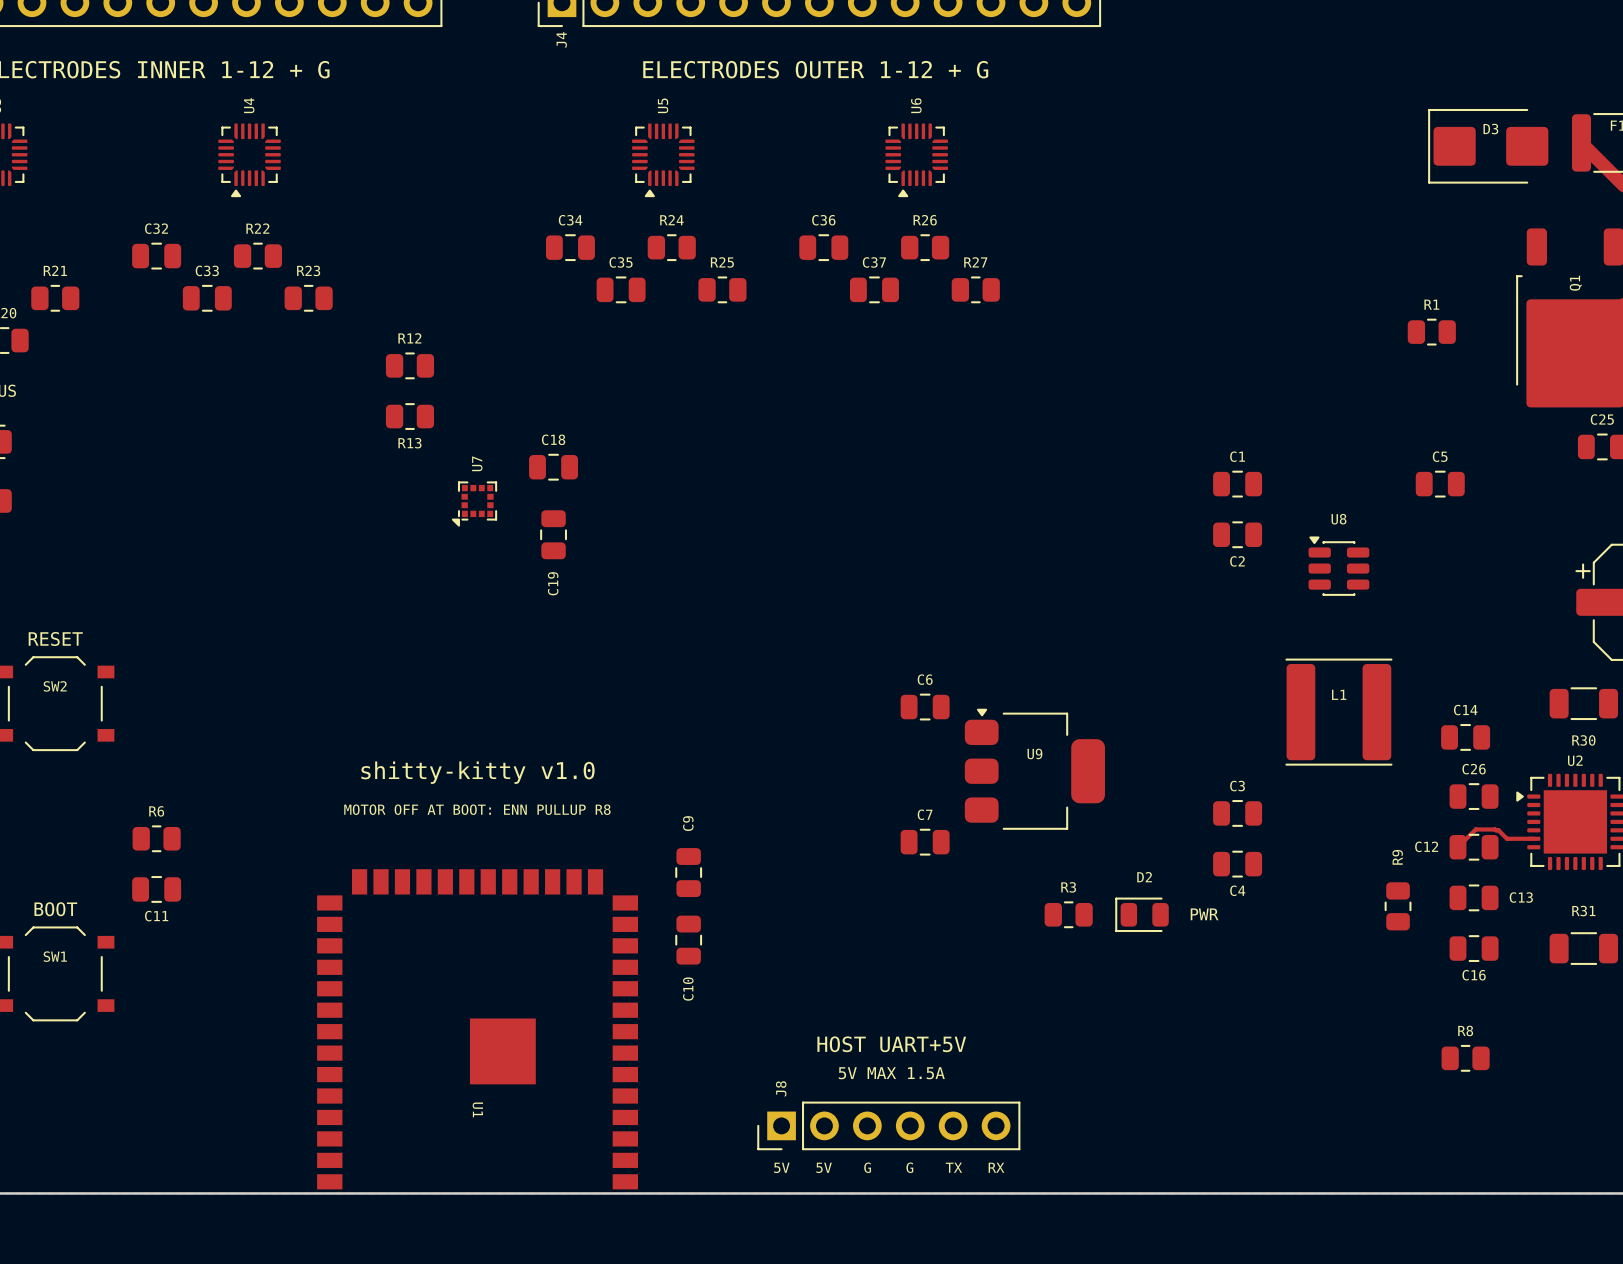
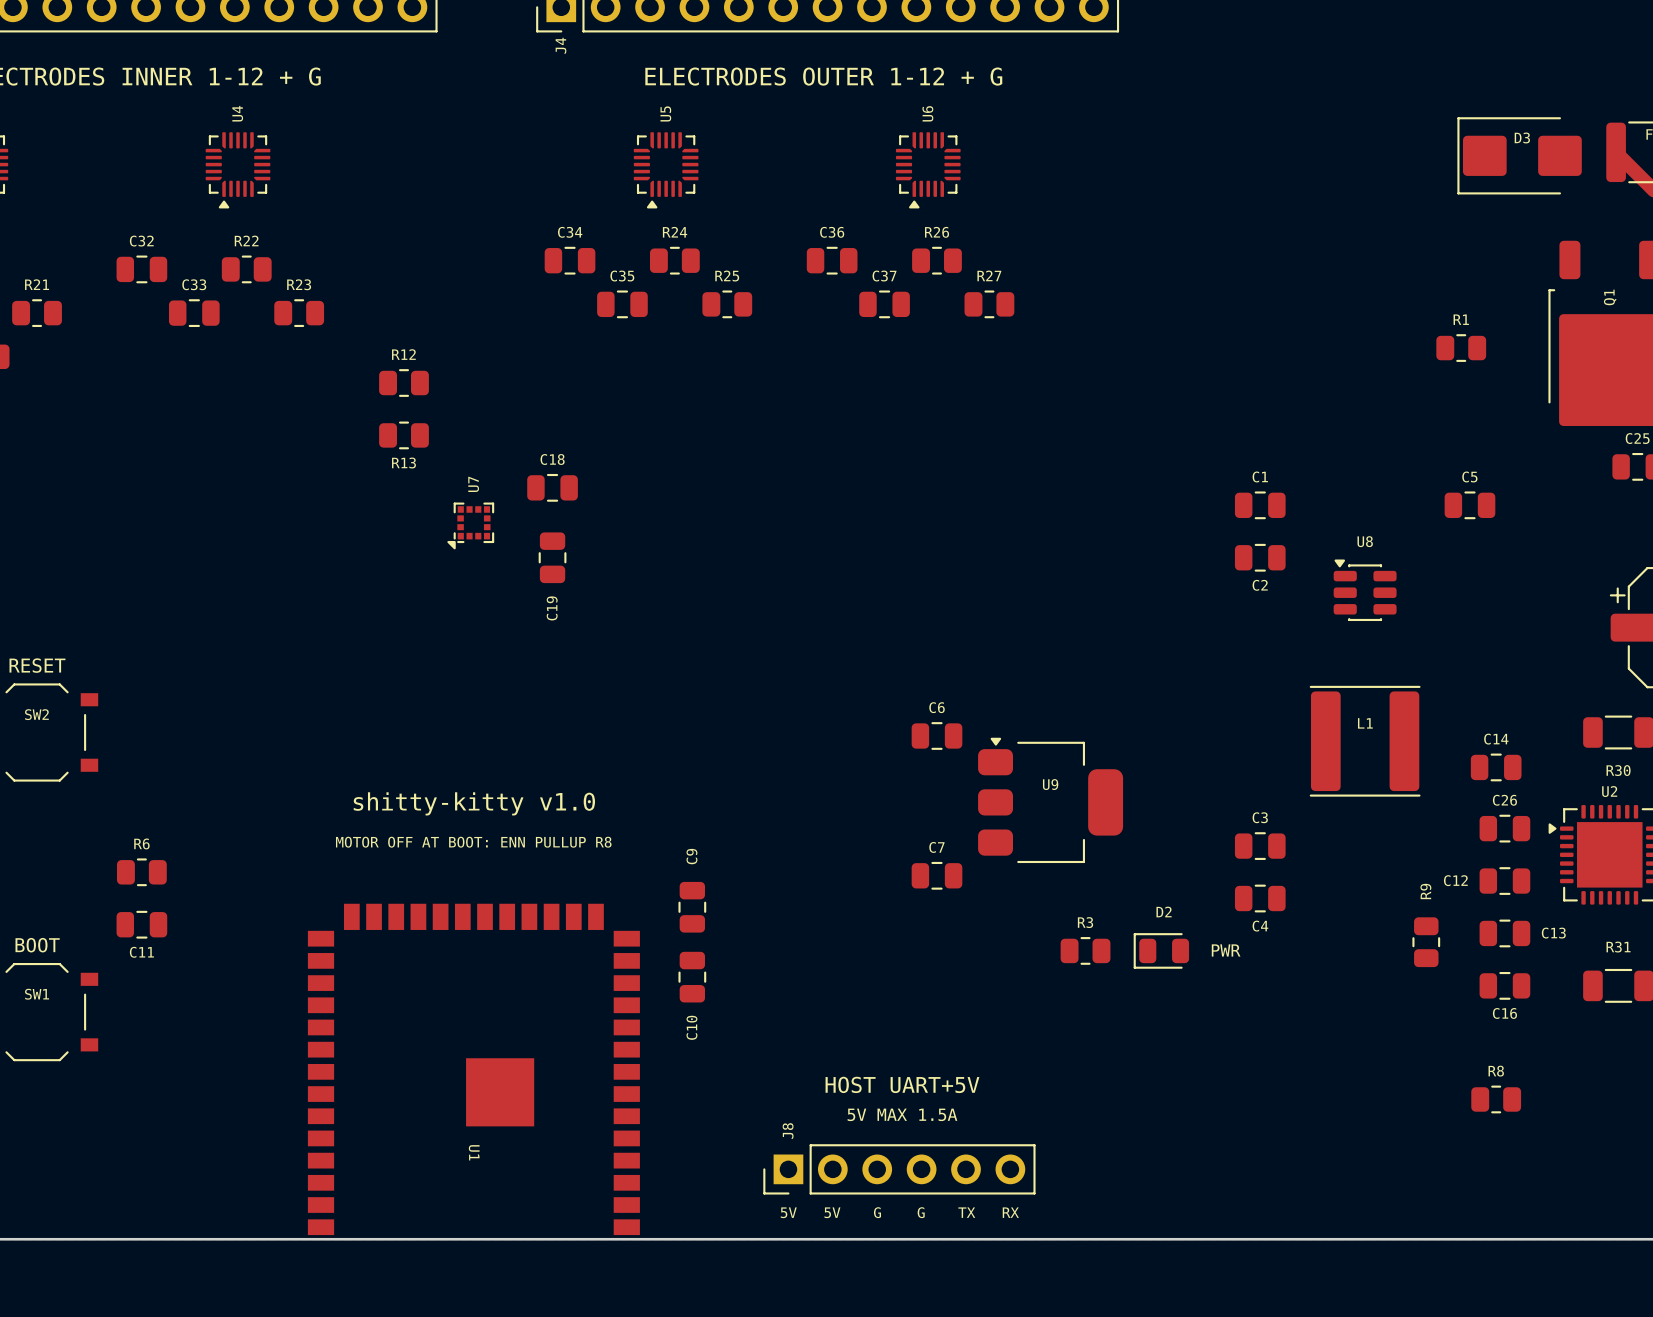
track: (1534, 838) (1506, 838) (1498, 830) (1475, 829) (1458, 847) -> none

